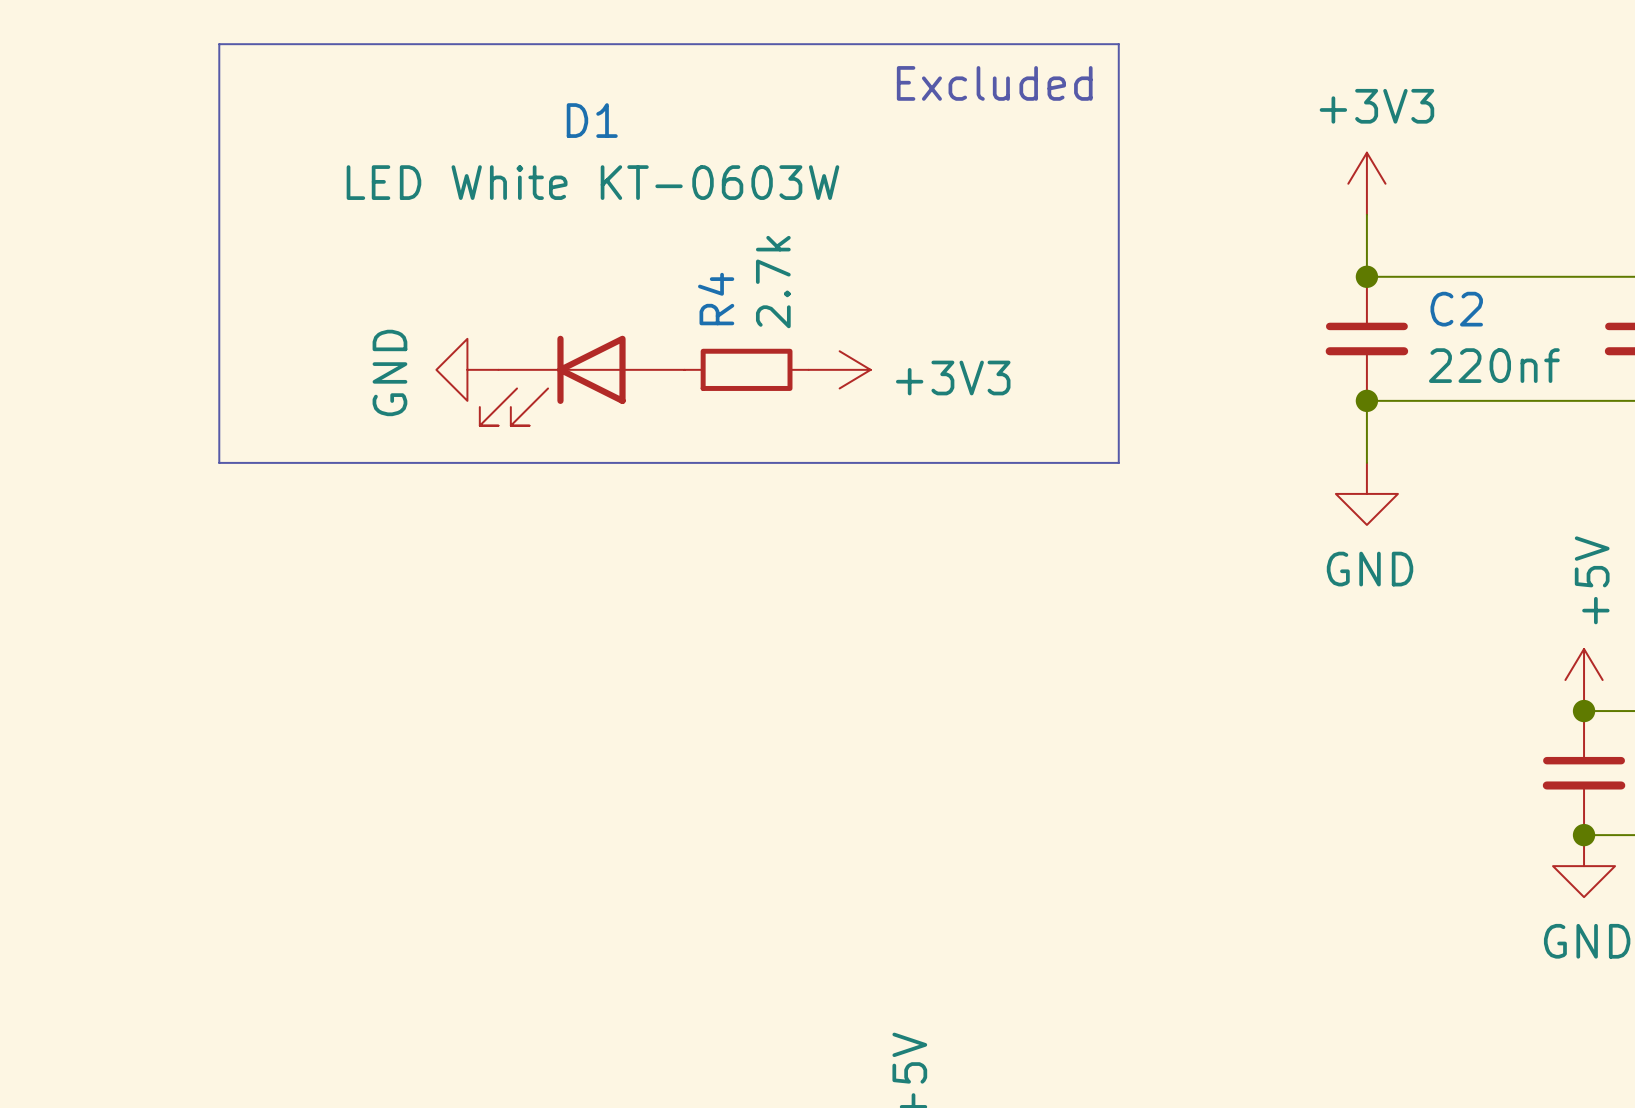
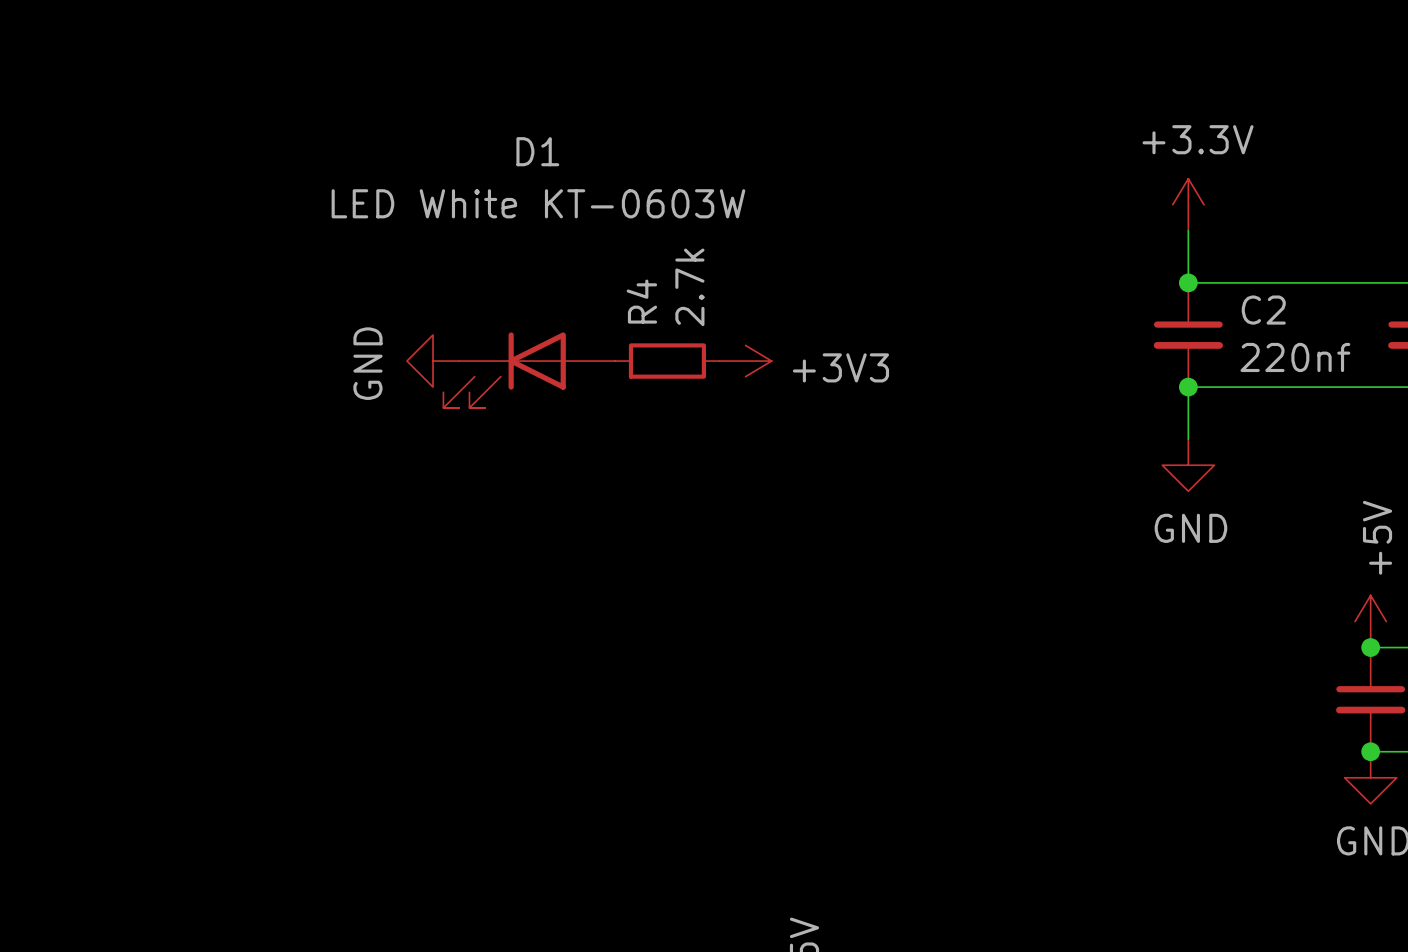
line: (219, 44) (1118, 44) (1118, 462) (219, 462) (219, 44) -> none
text: Excluded (994, 83) -> none
power symbol: +3V3 (1366, 183) -> +3.3V (1188, 204)

